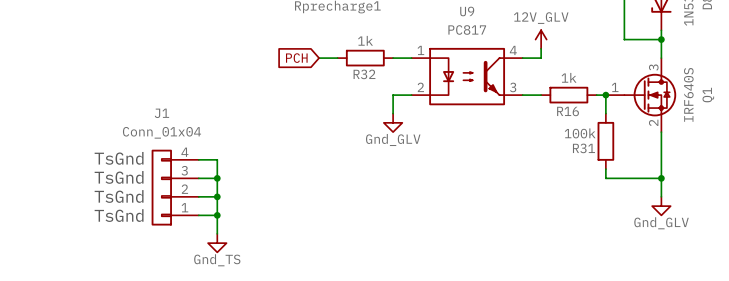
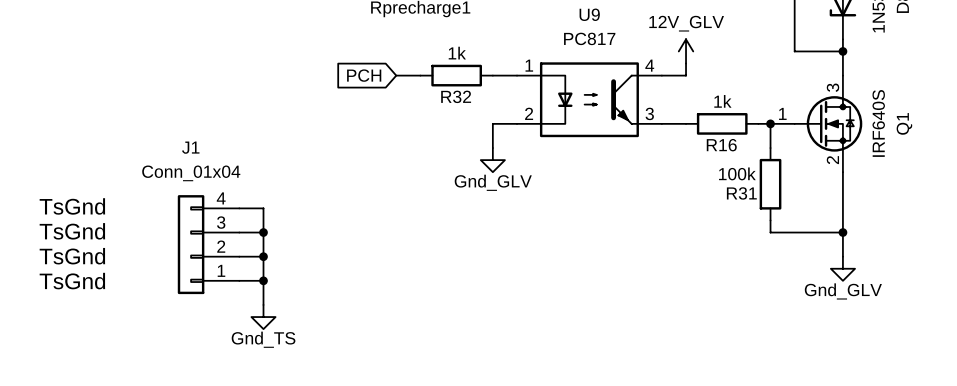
text: none -> TsGnd (72, 206)
text: TsGnd (119, 158) -> none
text: none -> TsGnd (72, 231)
text: TsGnd (119, 177) -> none
text: none -> TsGnd (72, 256)
text: TsGnd (119, 196) -> none
text: none -> TsGnd (72, 281)
text: TsGnd (119, 215) -> none

